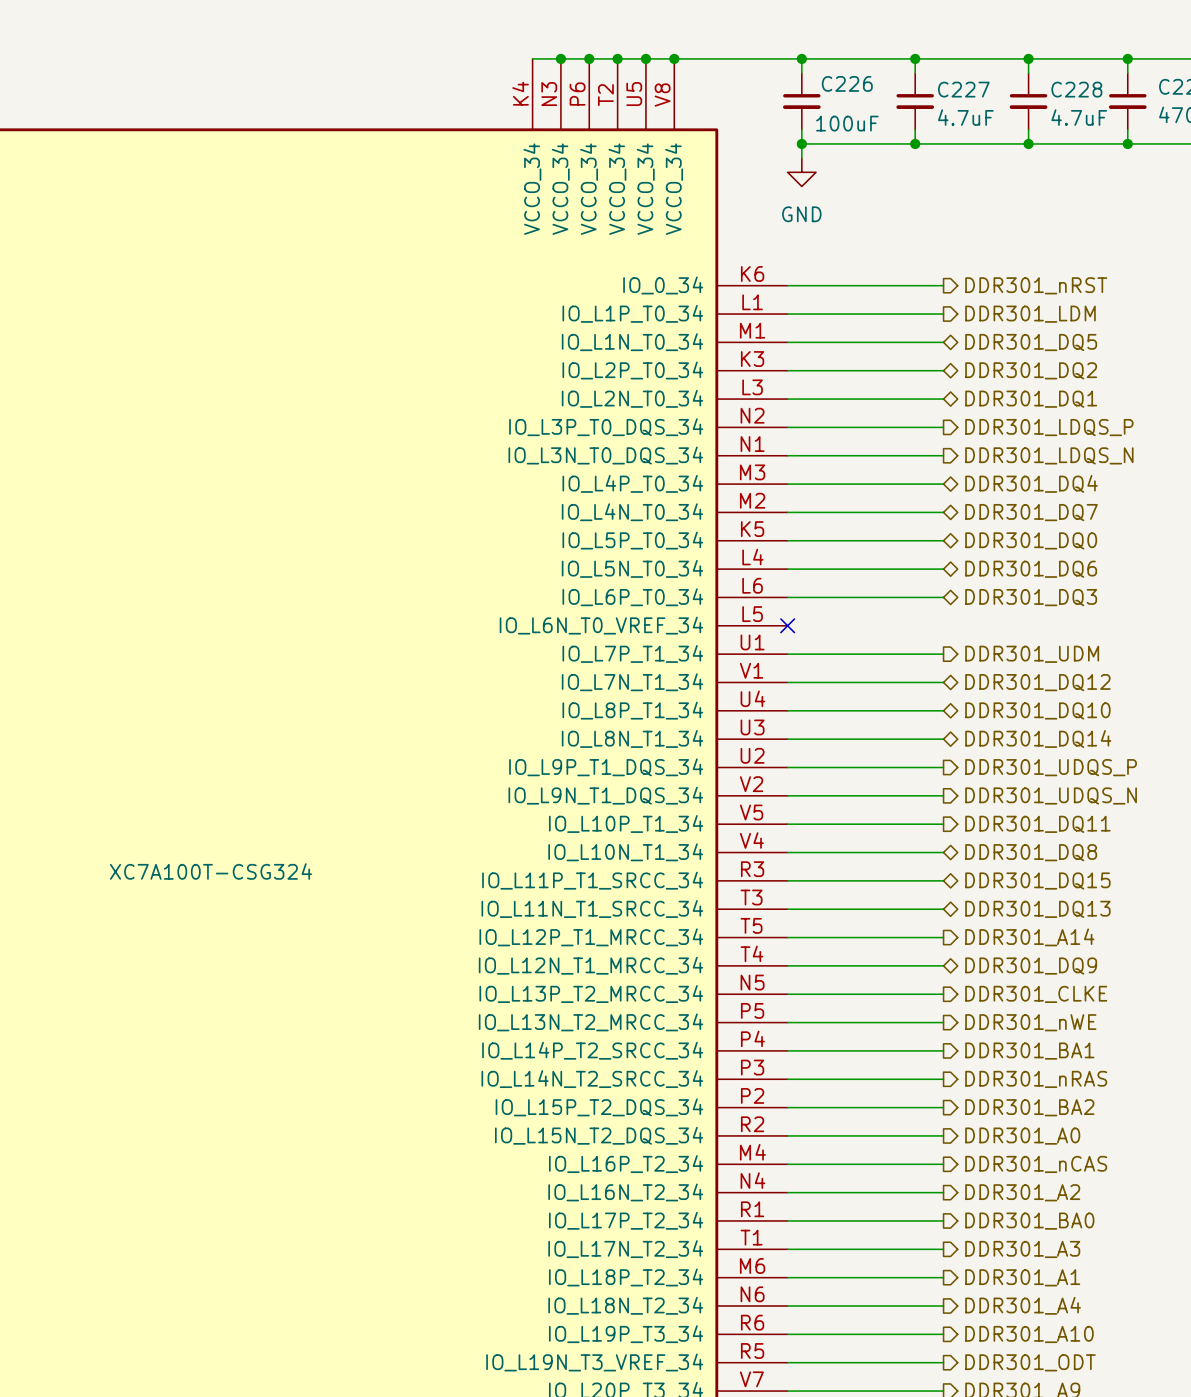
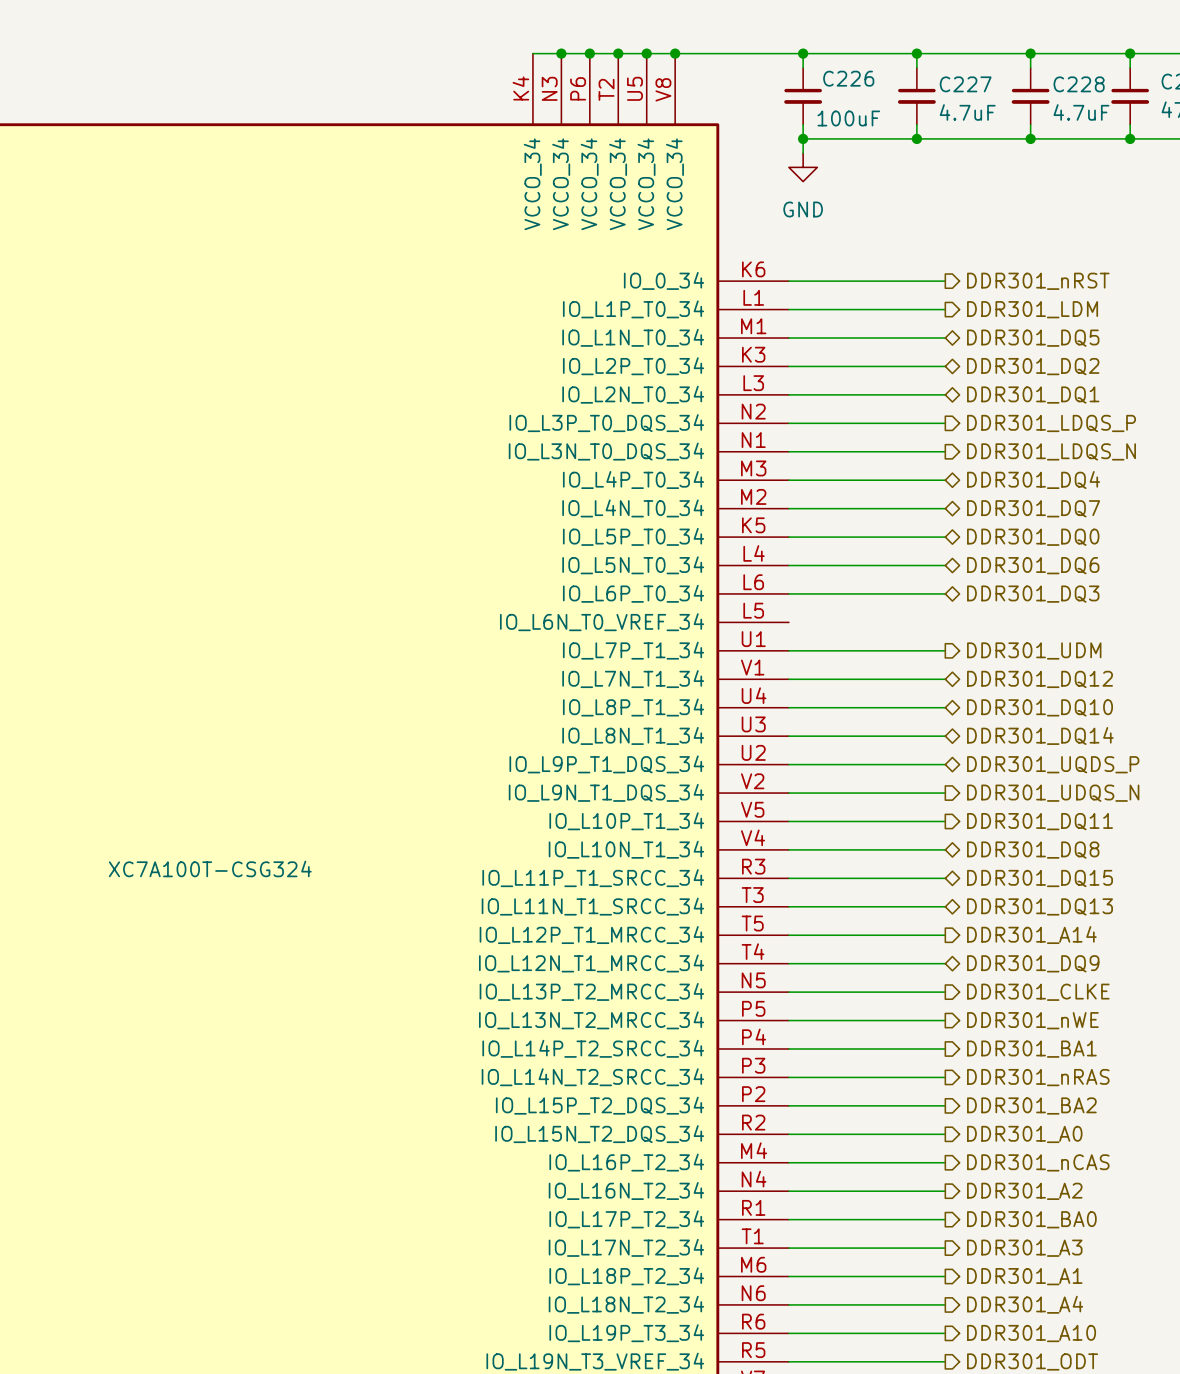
no-connect mark: (787, 625) -> none
hierarchical label shape: output (1051, 767) -> bidirectional (1053, 764)
hierarchical label: DDR301_UDQS_P (1051, 767) -> DDR301_UQDS_P (1053, 764)

